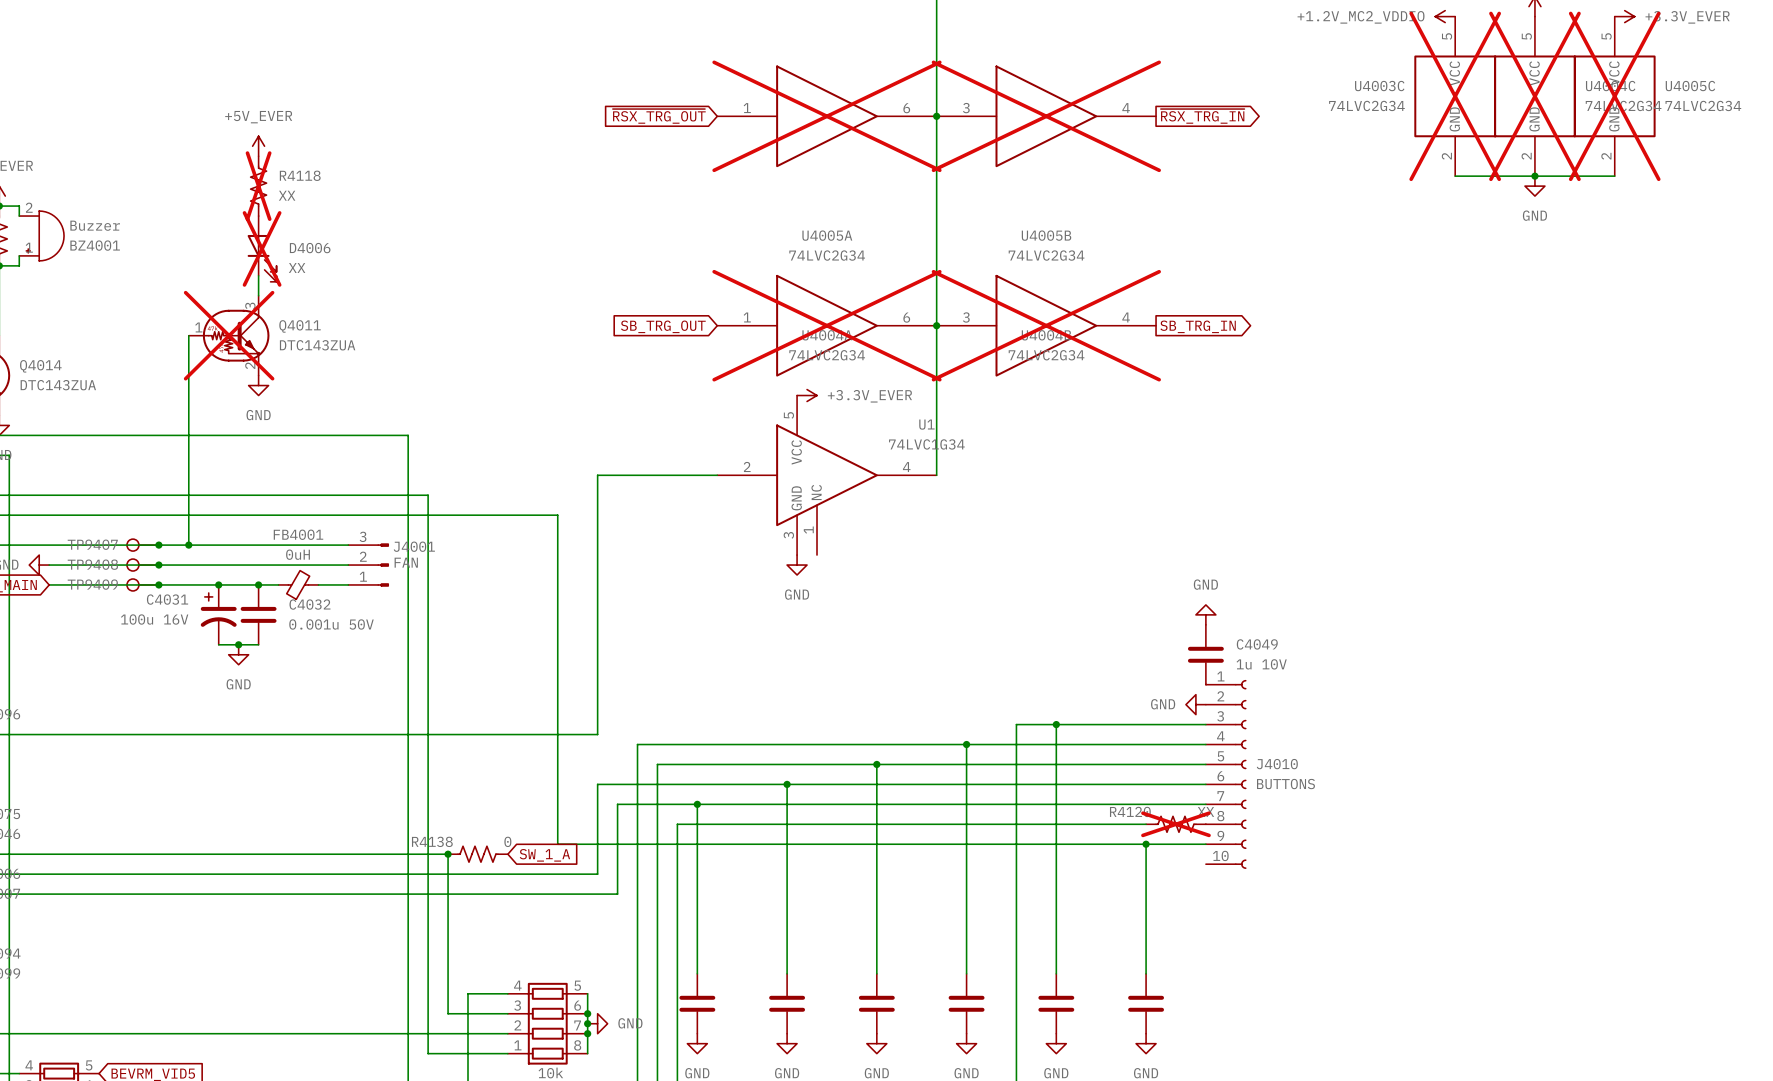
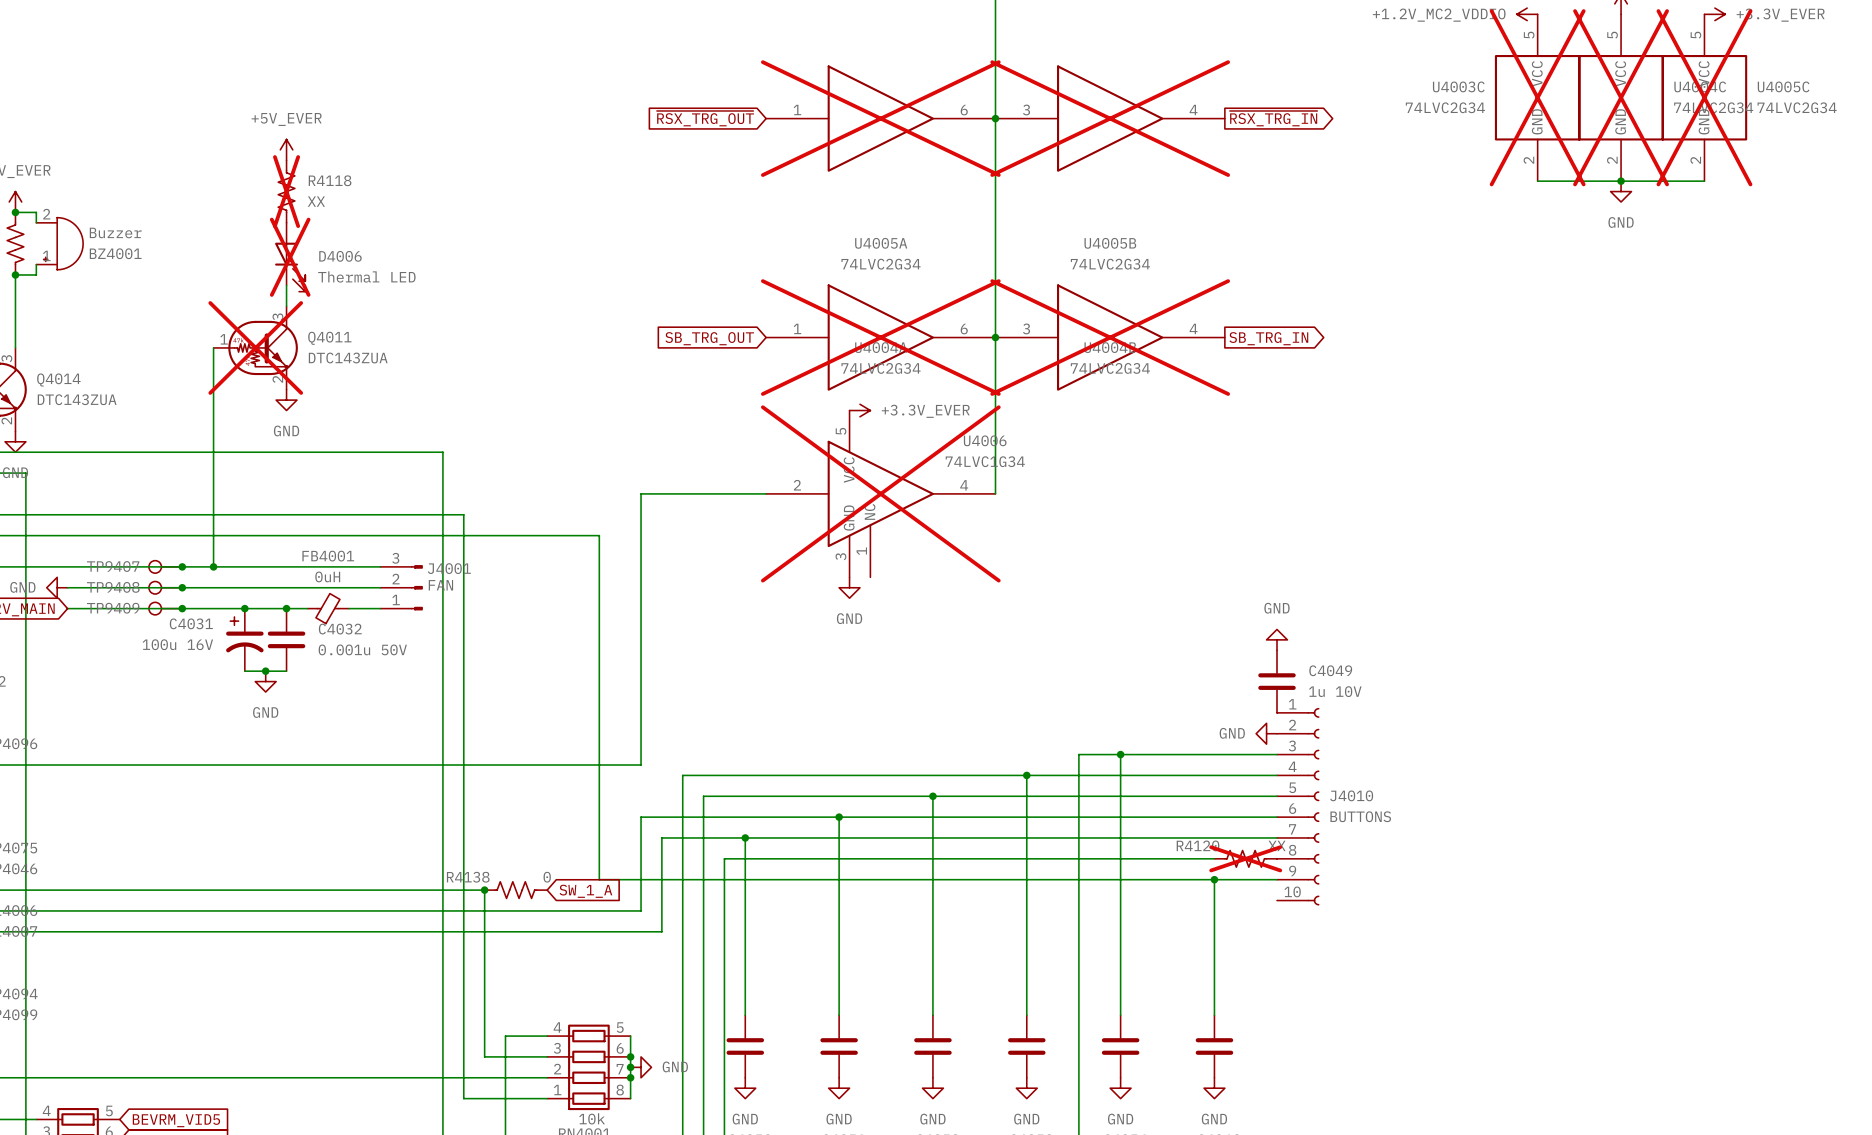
D4006 value: XX (297, 268) -> Thermal LED (366, 276)
U1 name: U1 (926, 424) -> U4006 (985, 440)
U1 do-not-place cross: none -> (880, 493)

